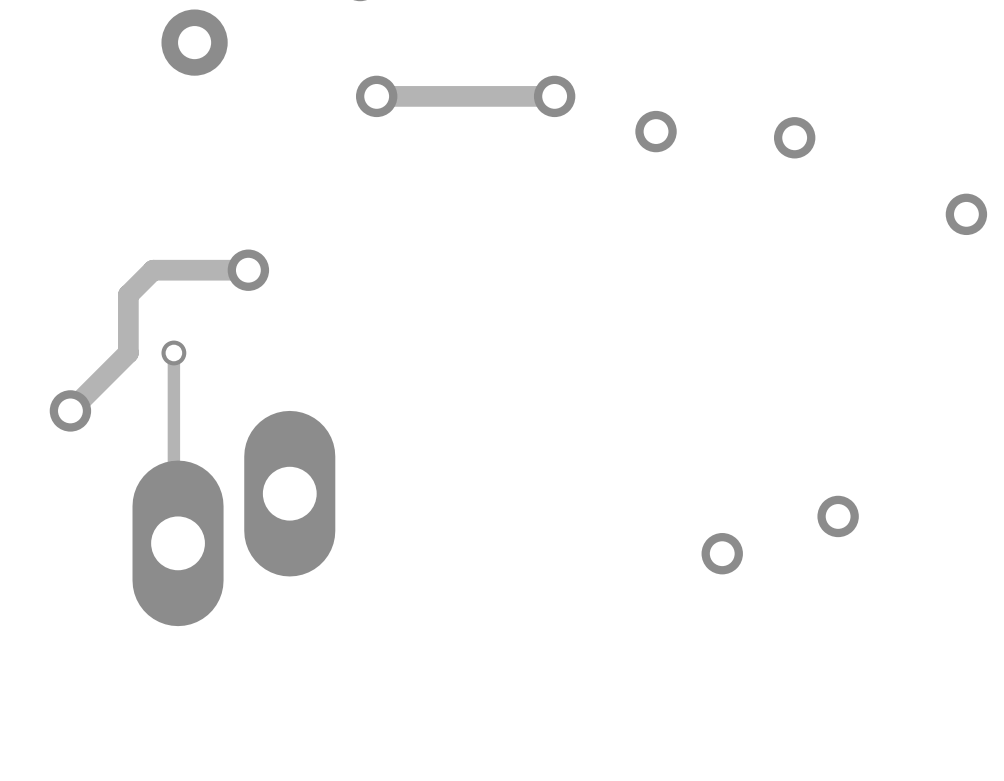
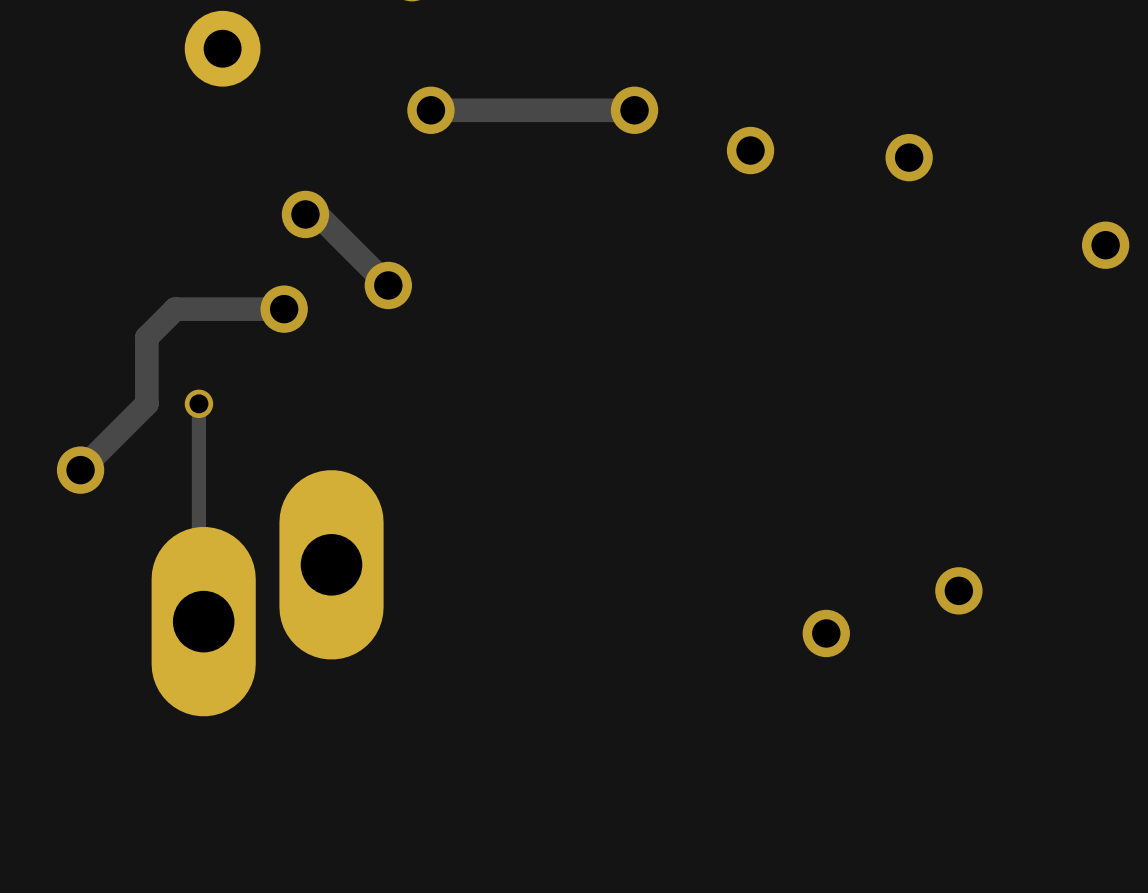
track: none -> (305, 214) (317, 214) (388, 285)
via: none -> (305, 214)
via: none -> (388, 285)

